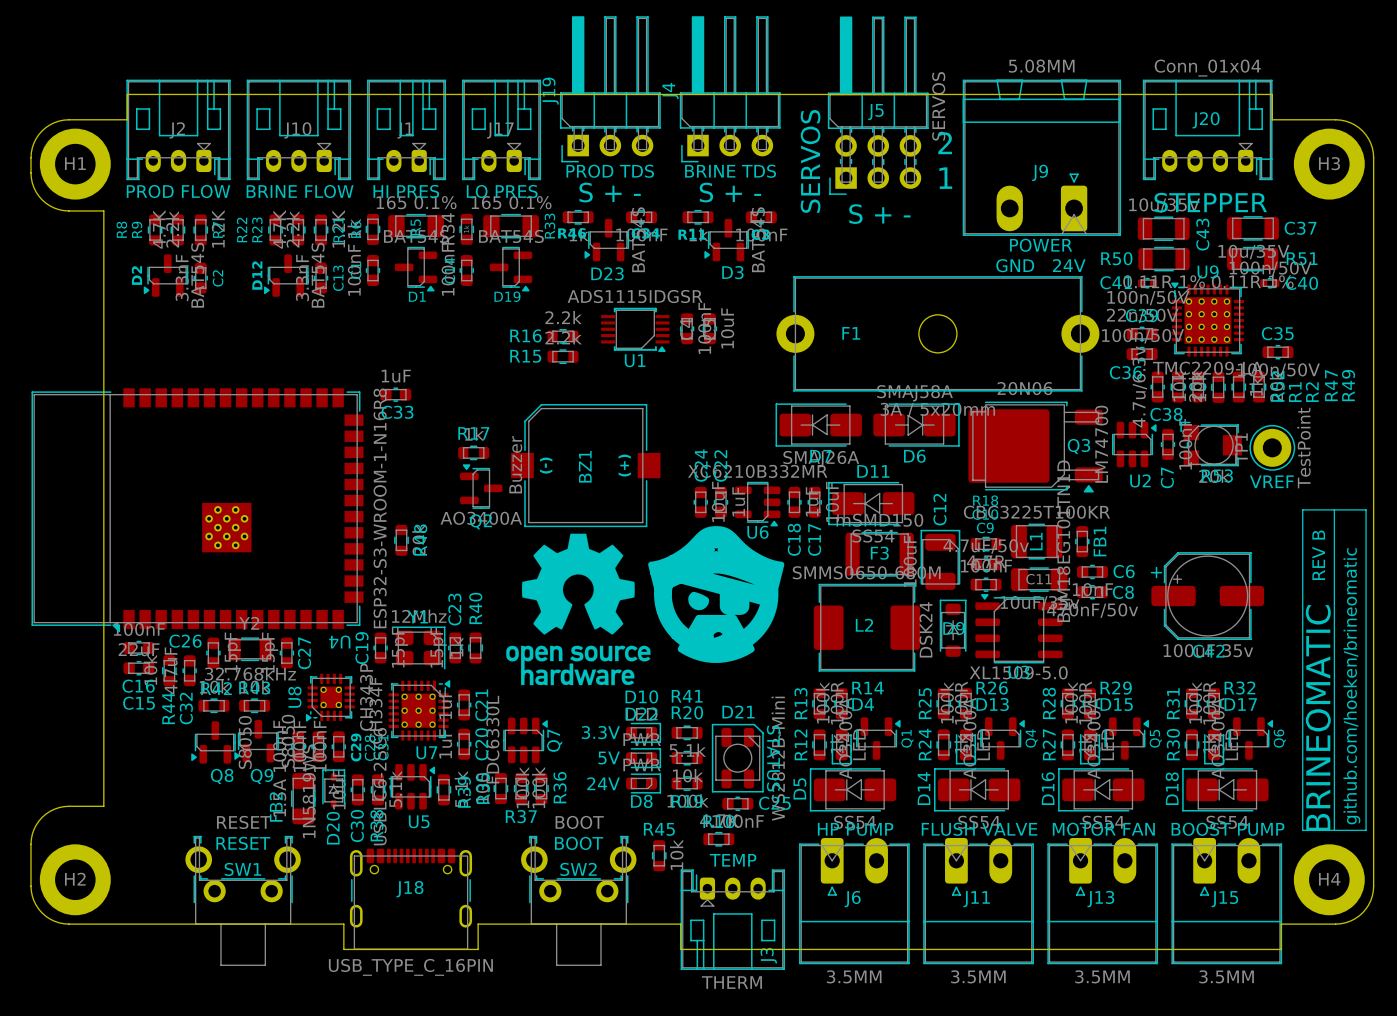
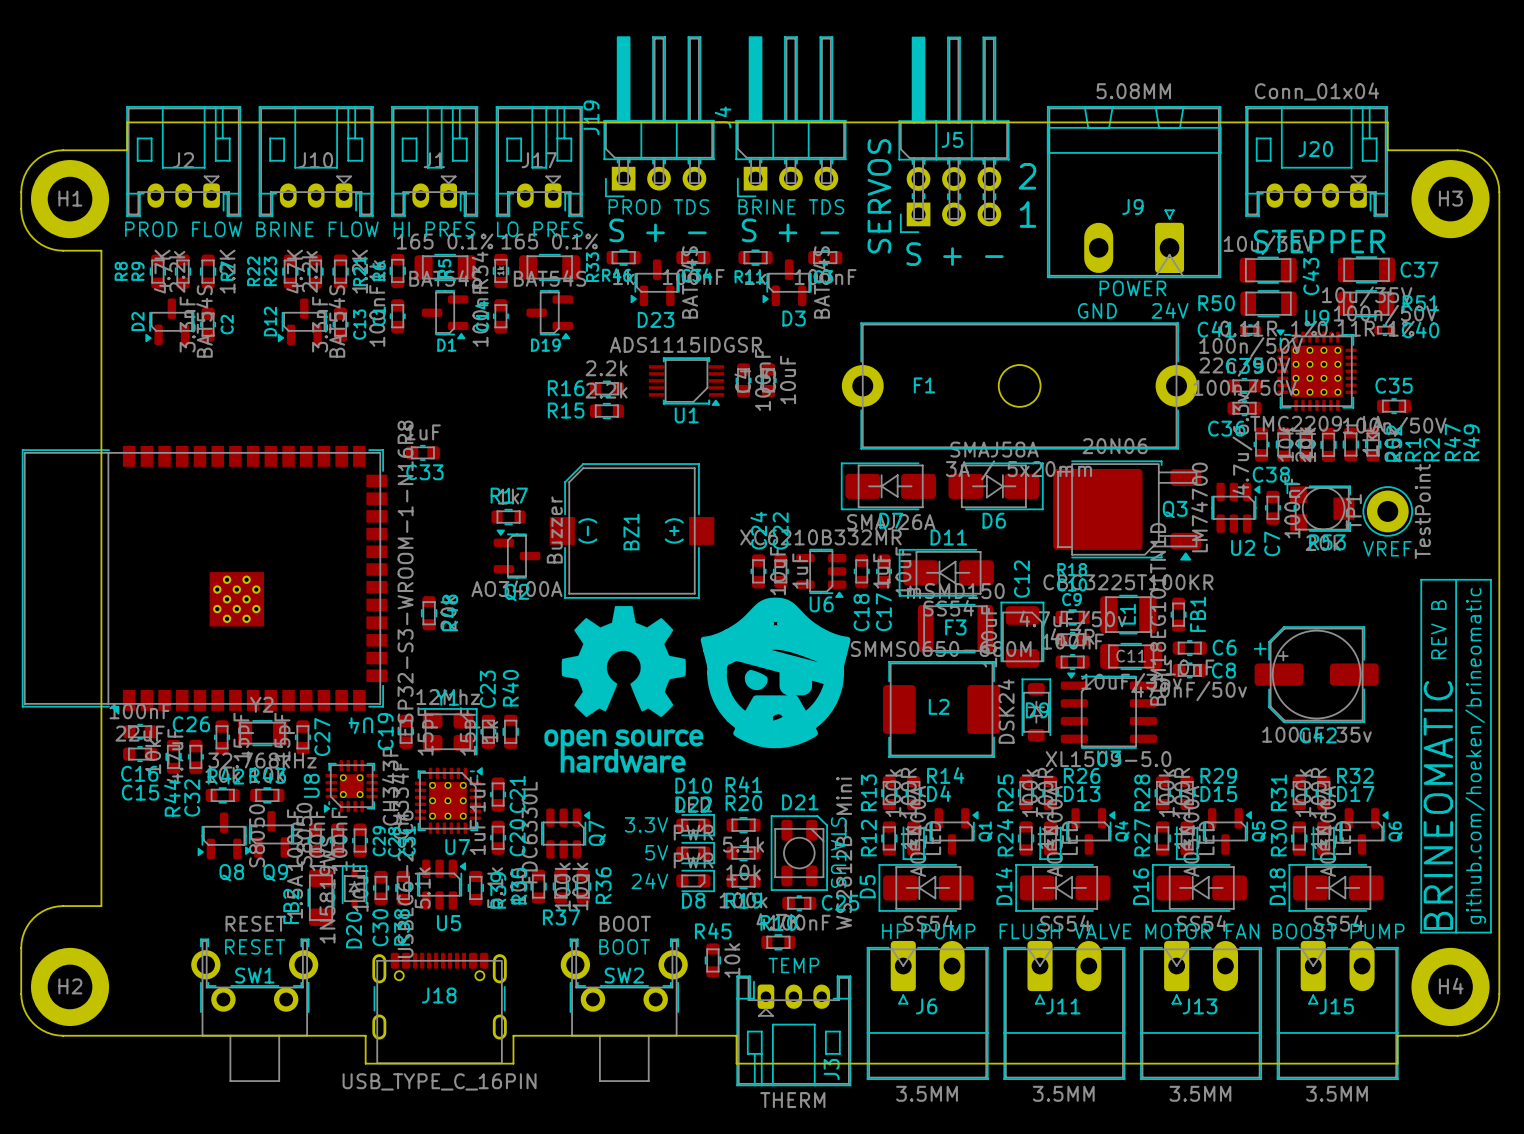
J5 value: SERVOS (938, 106) -> none

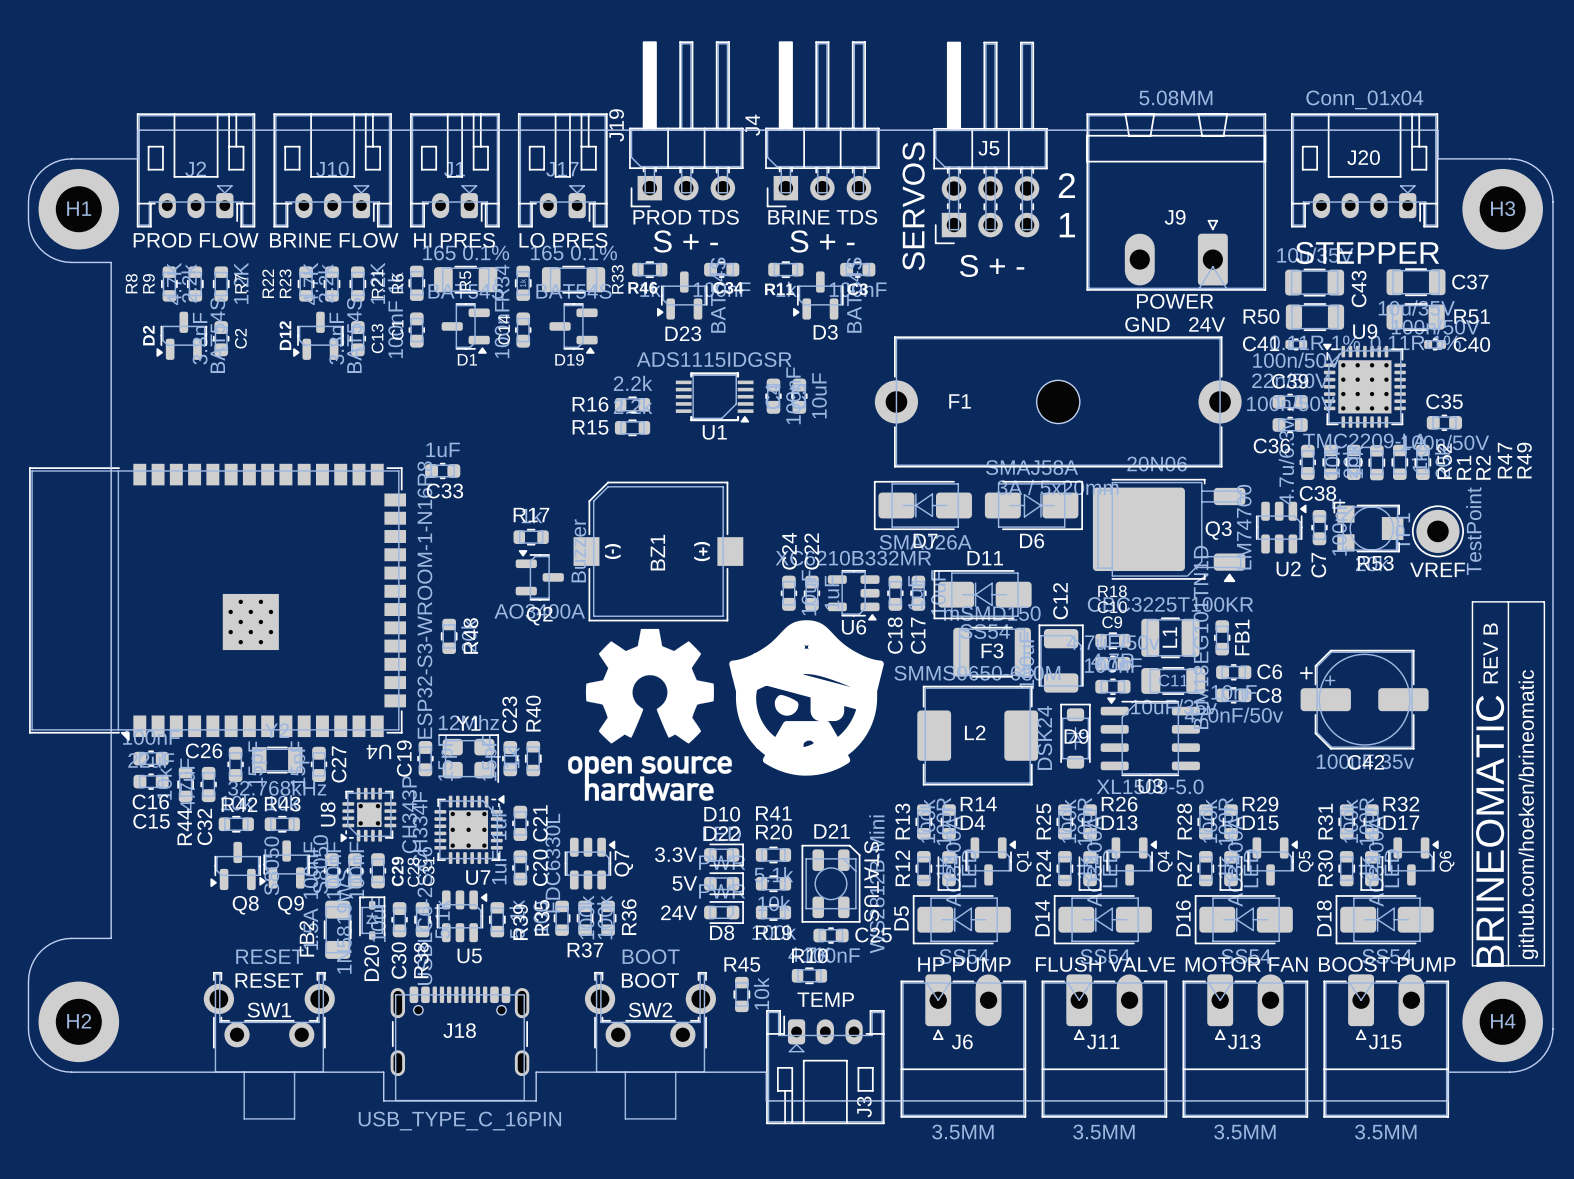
J3 value: THERM (792, 1100) -> none

